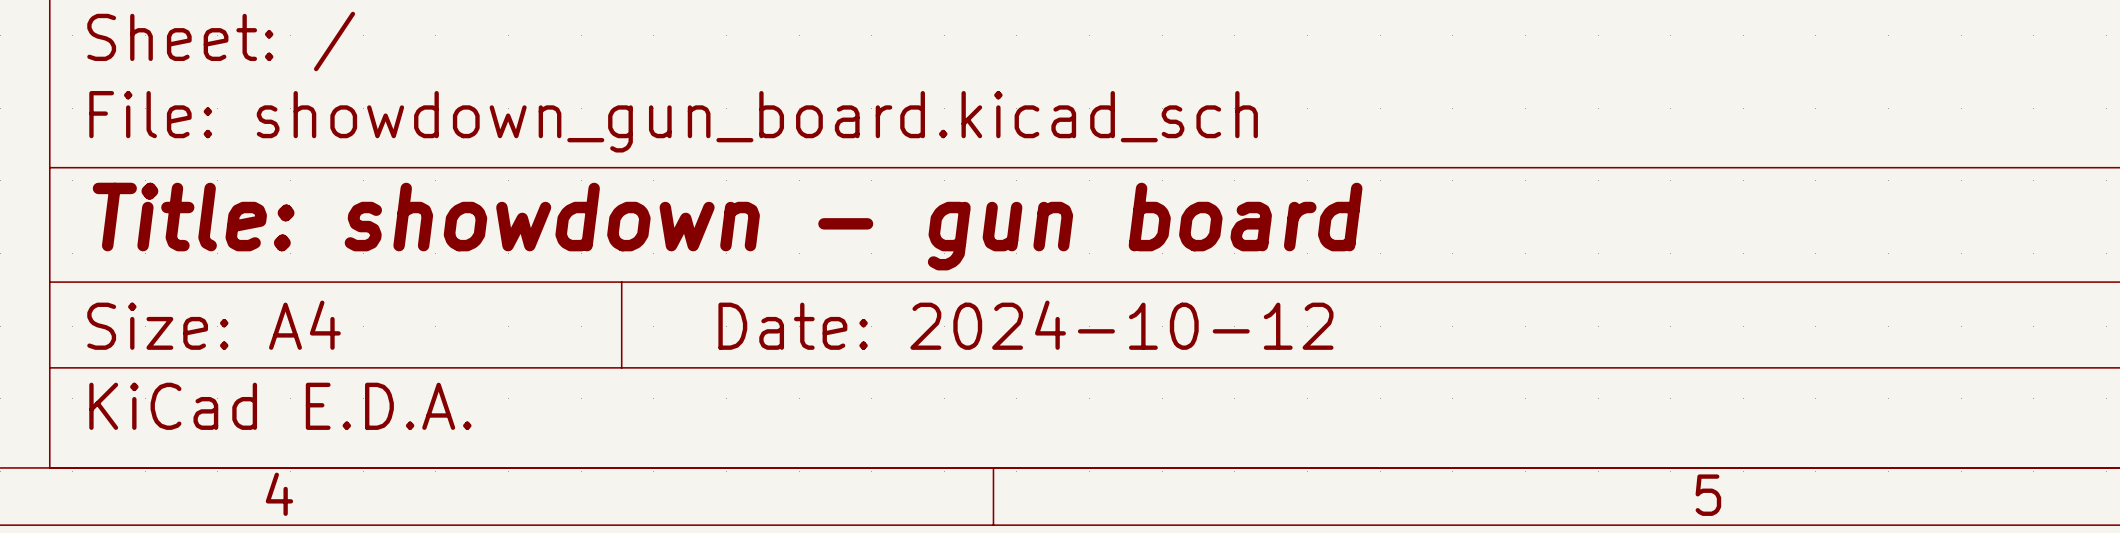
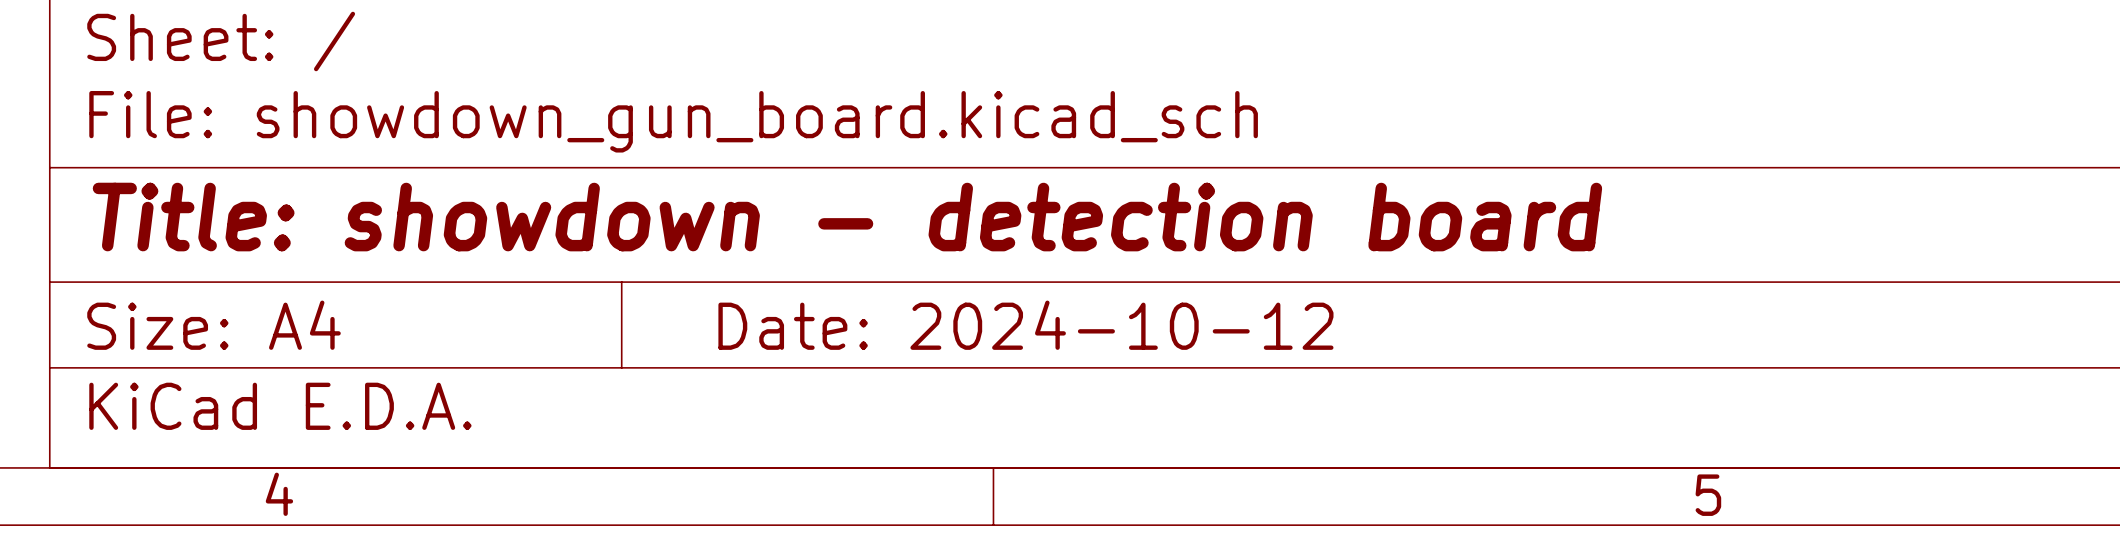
title block: Title: showdown - gun board (727, 226) -> Title: showdown - detection board (847, 217)

